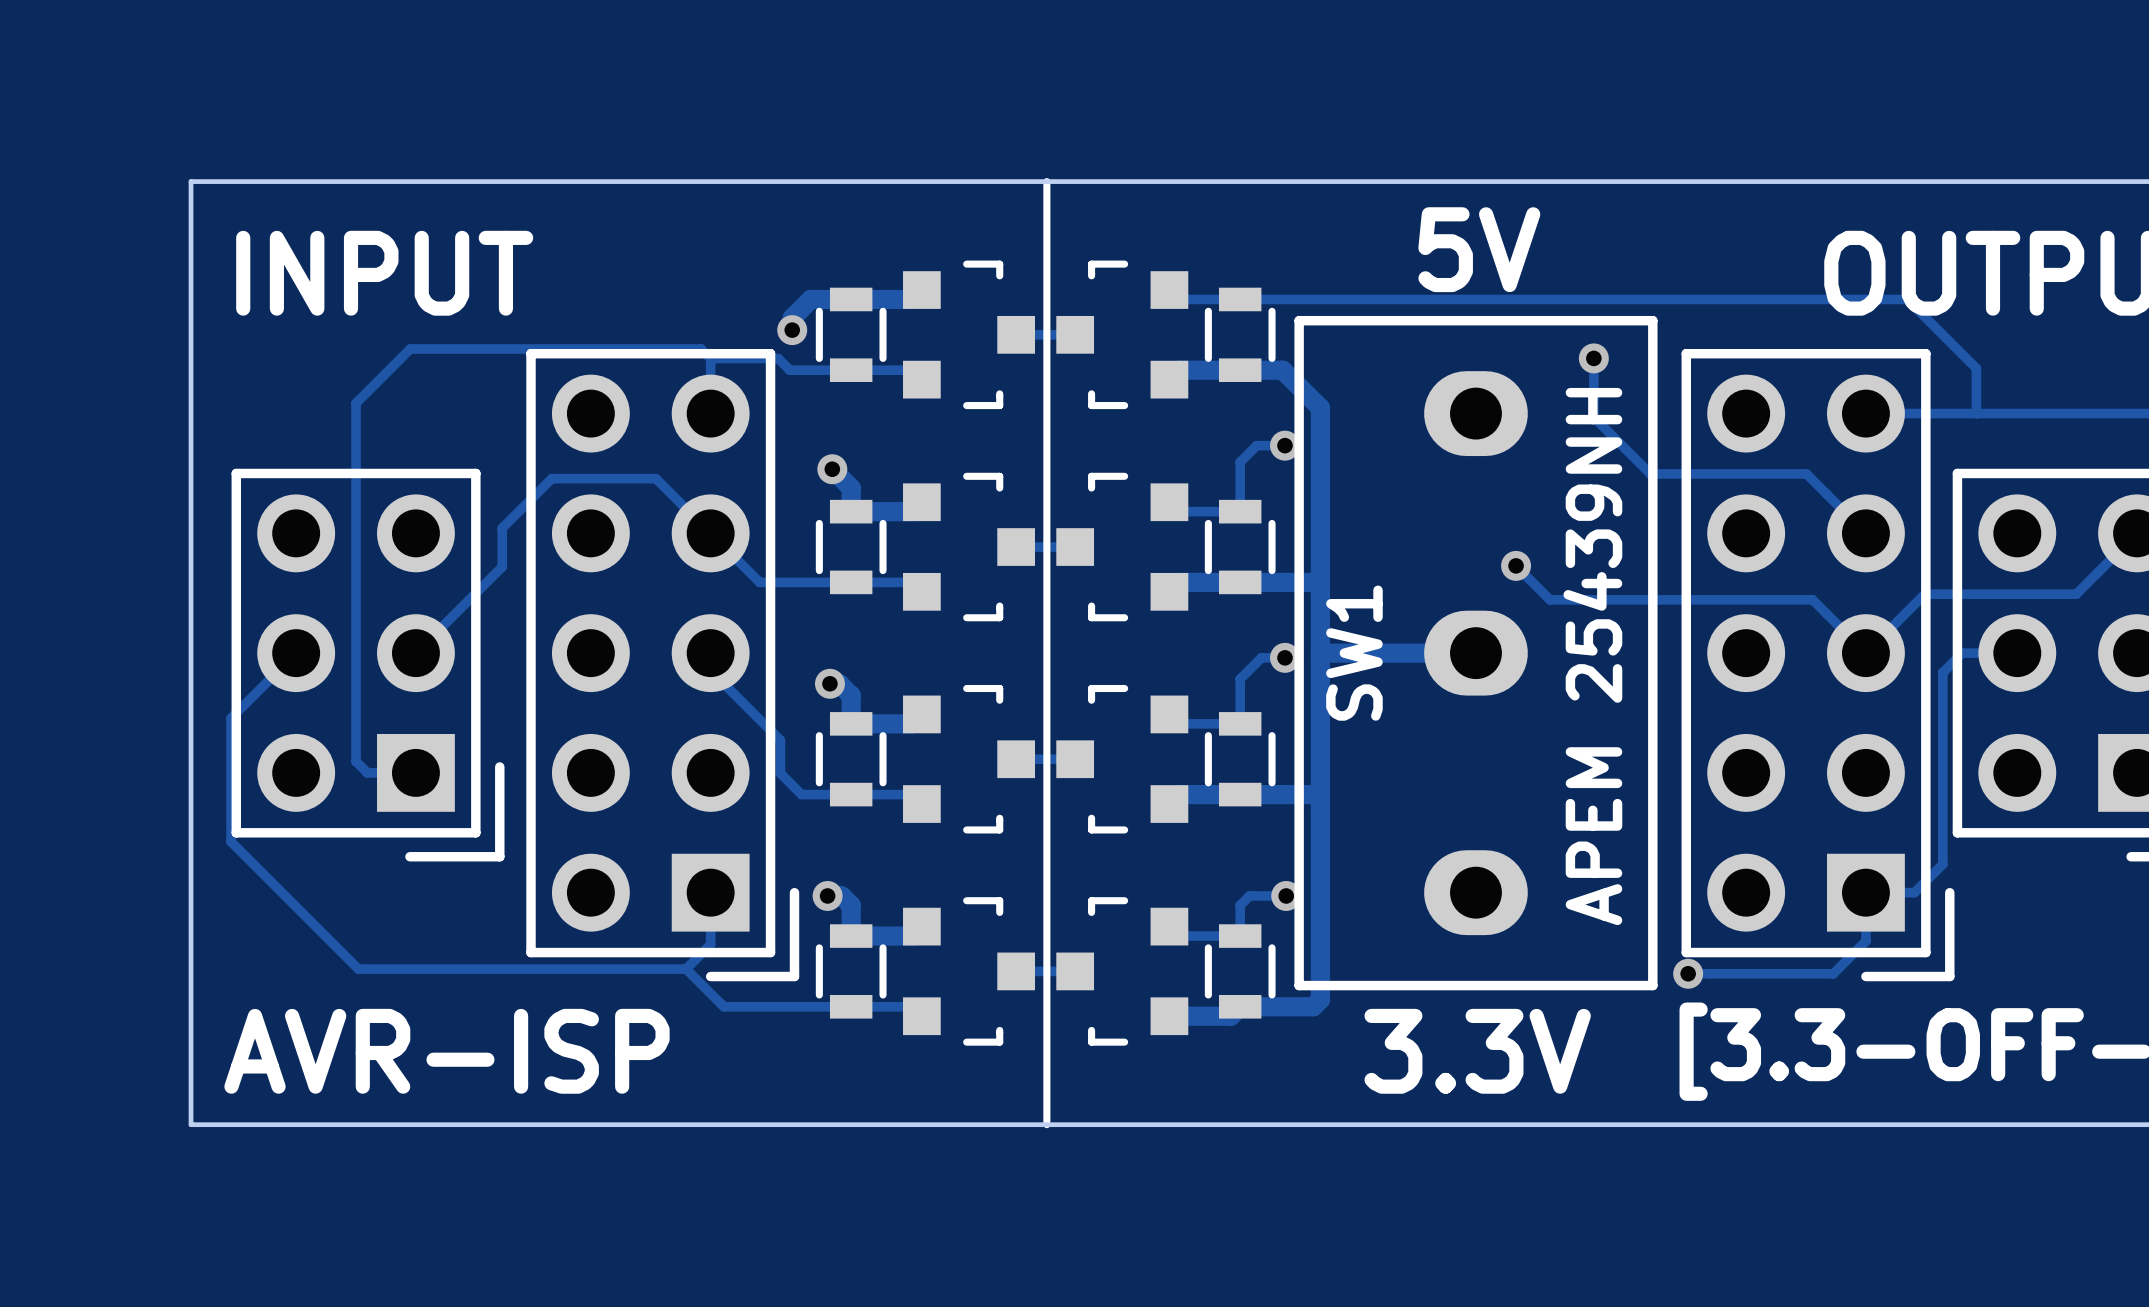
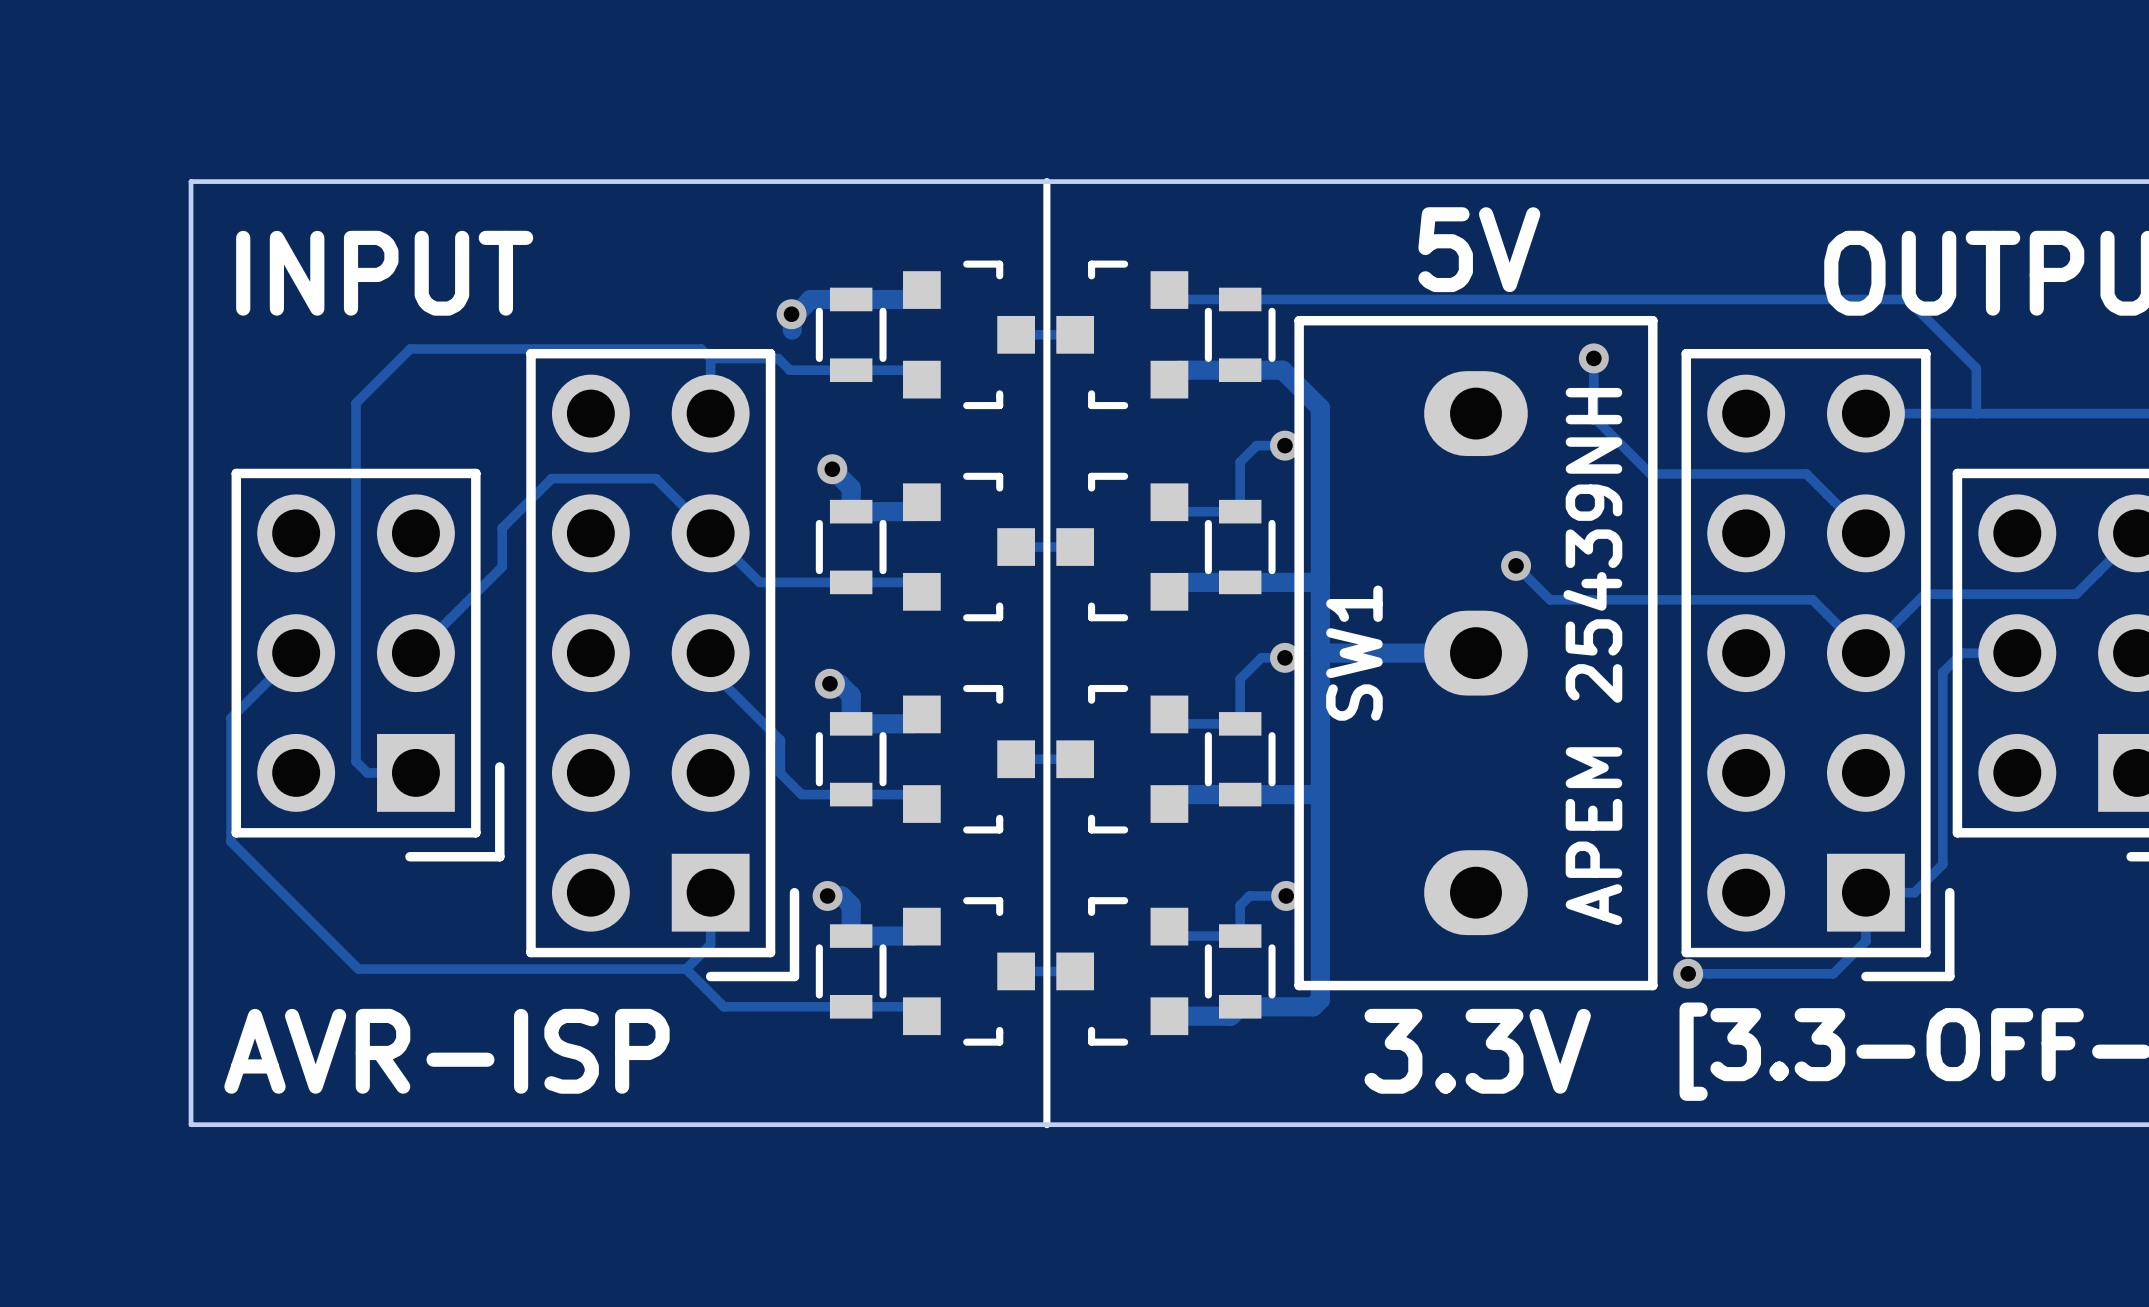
via position: (792, 330) -> (791, 314)

